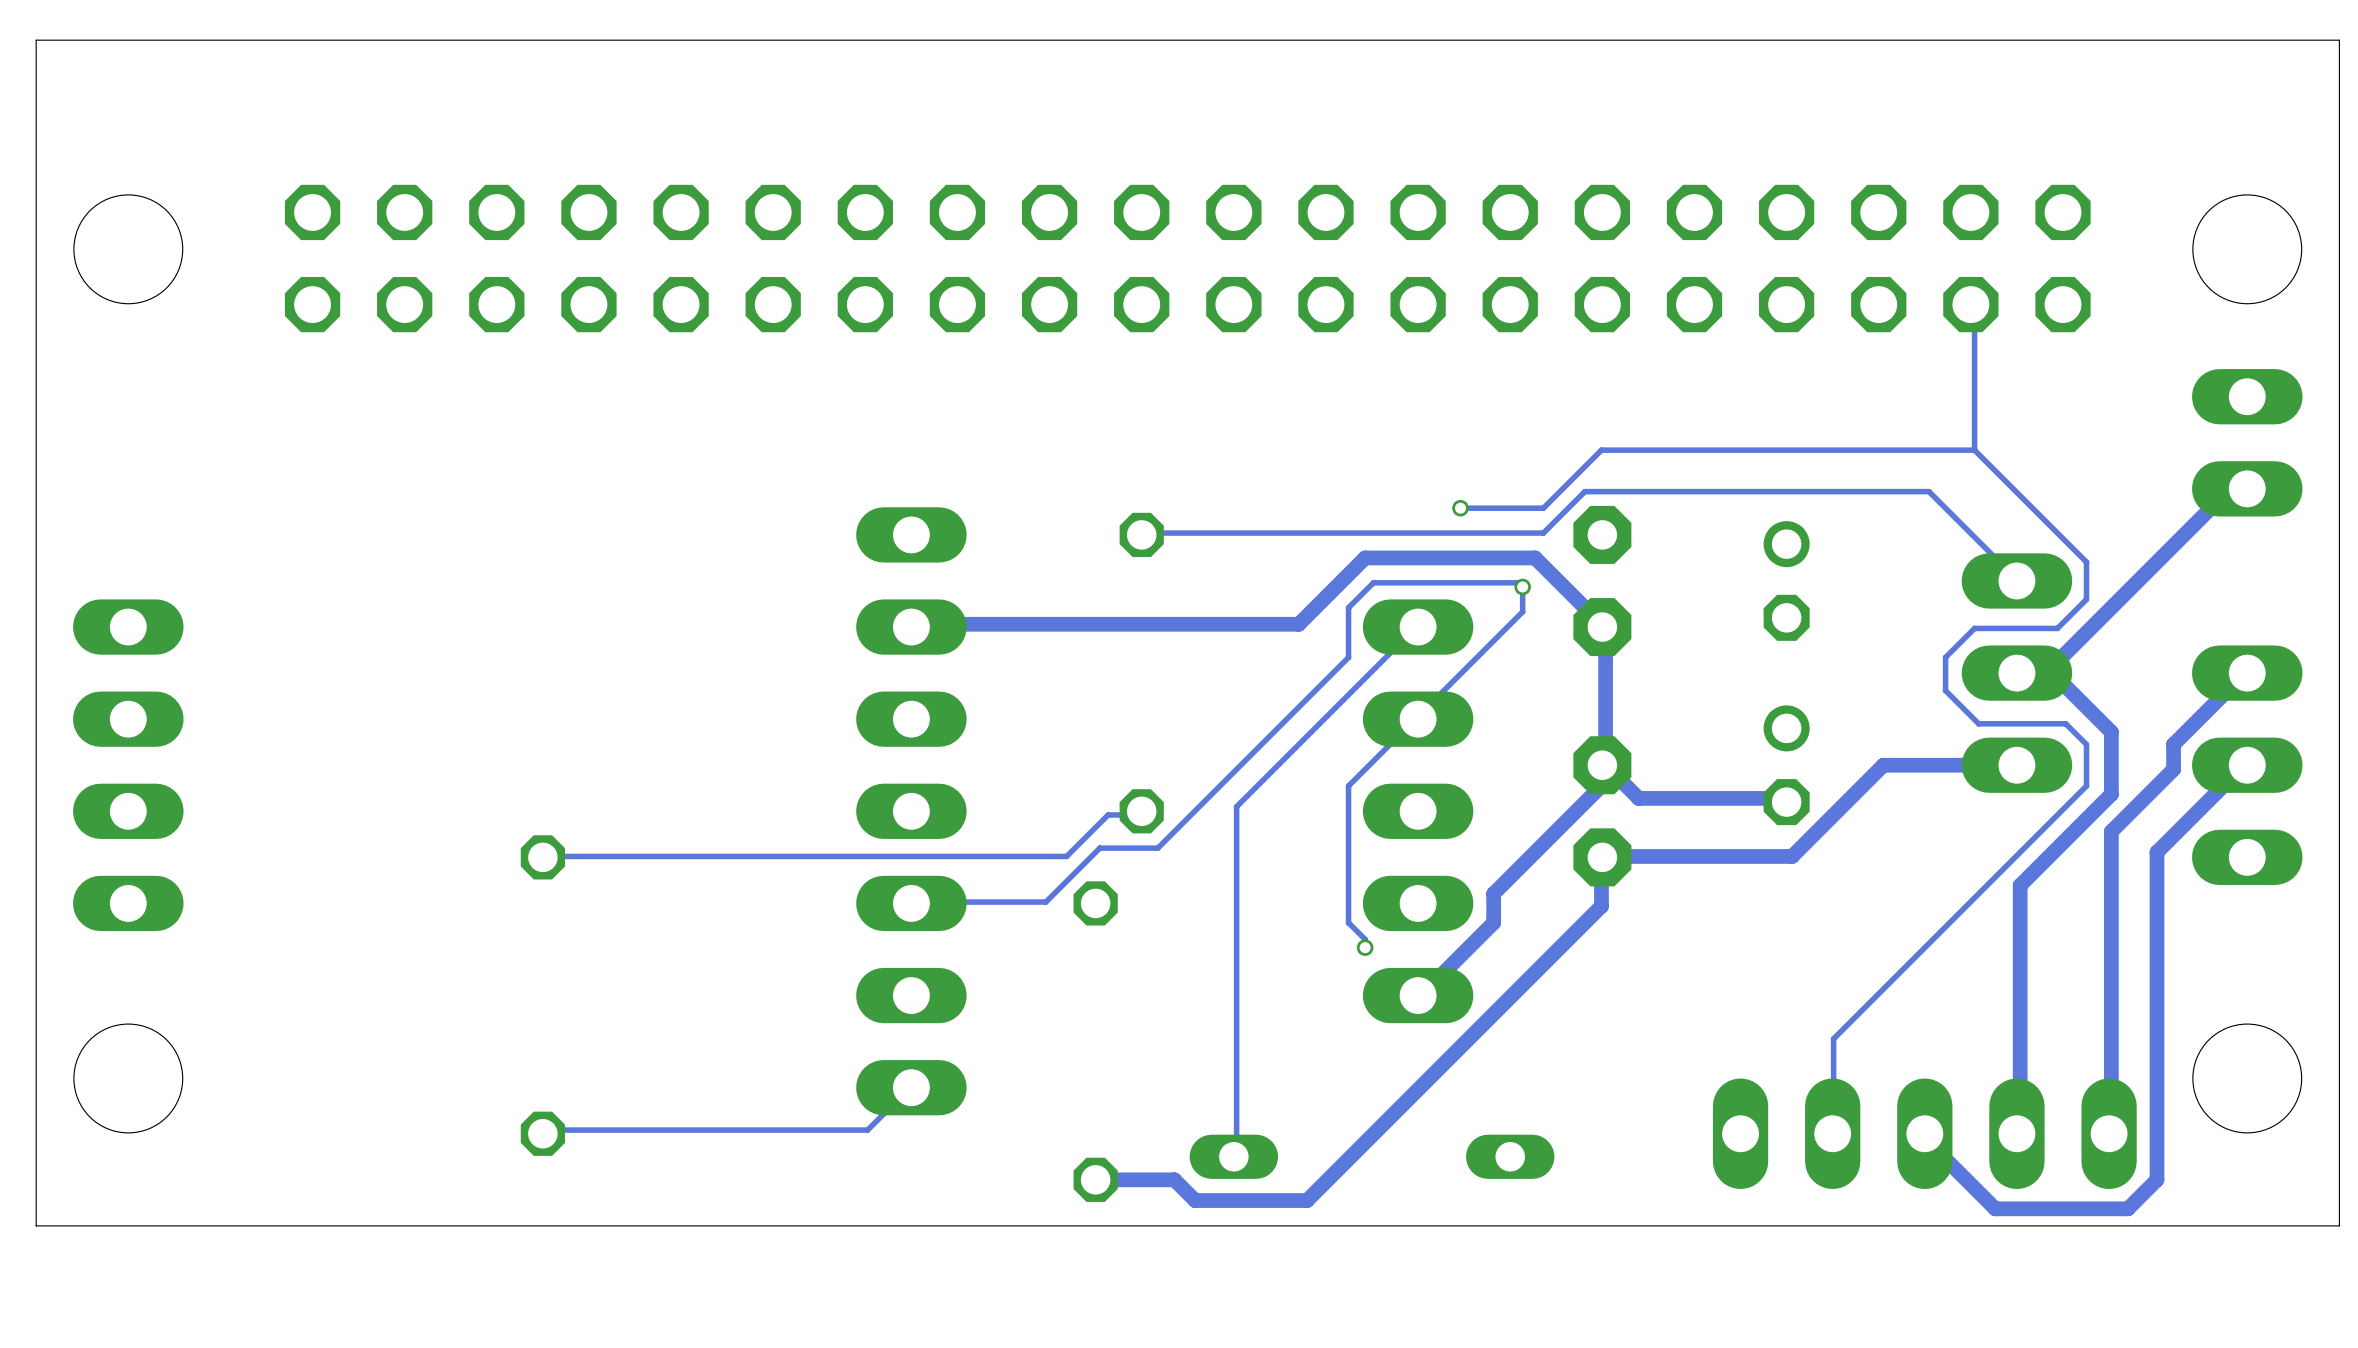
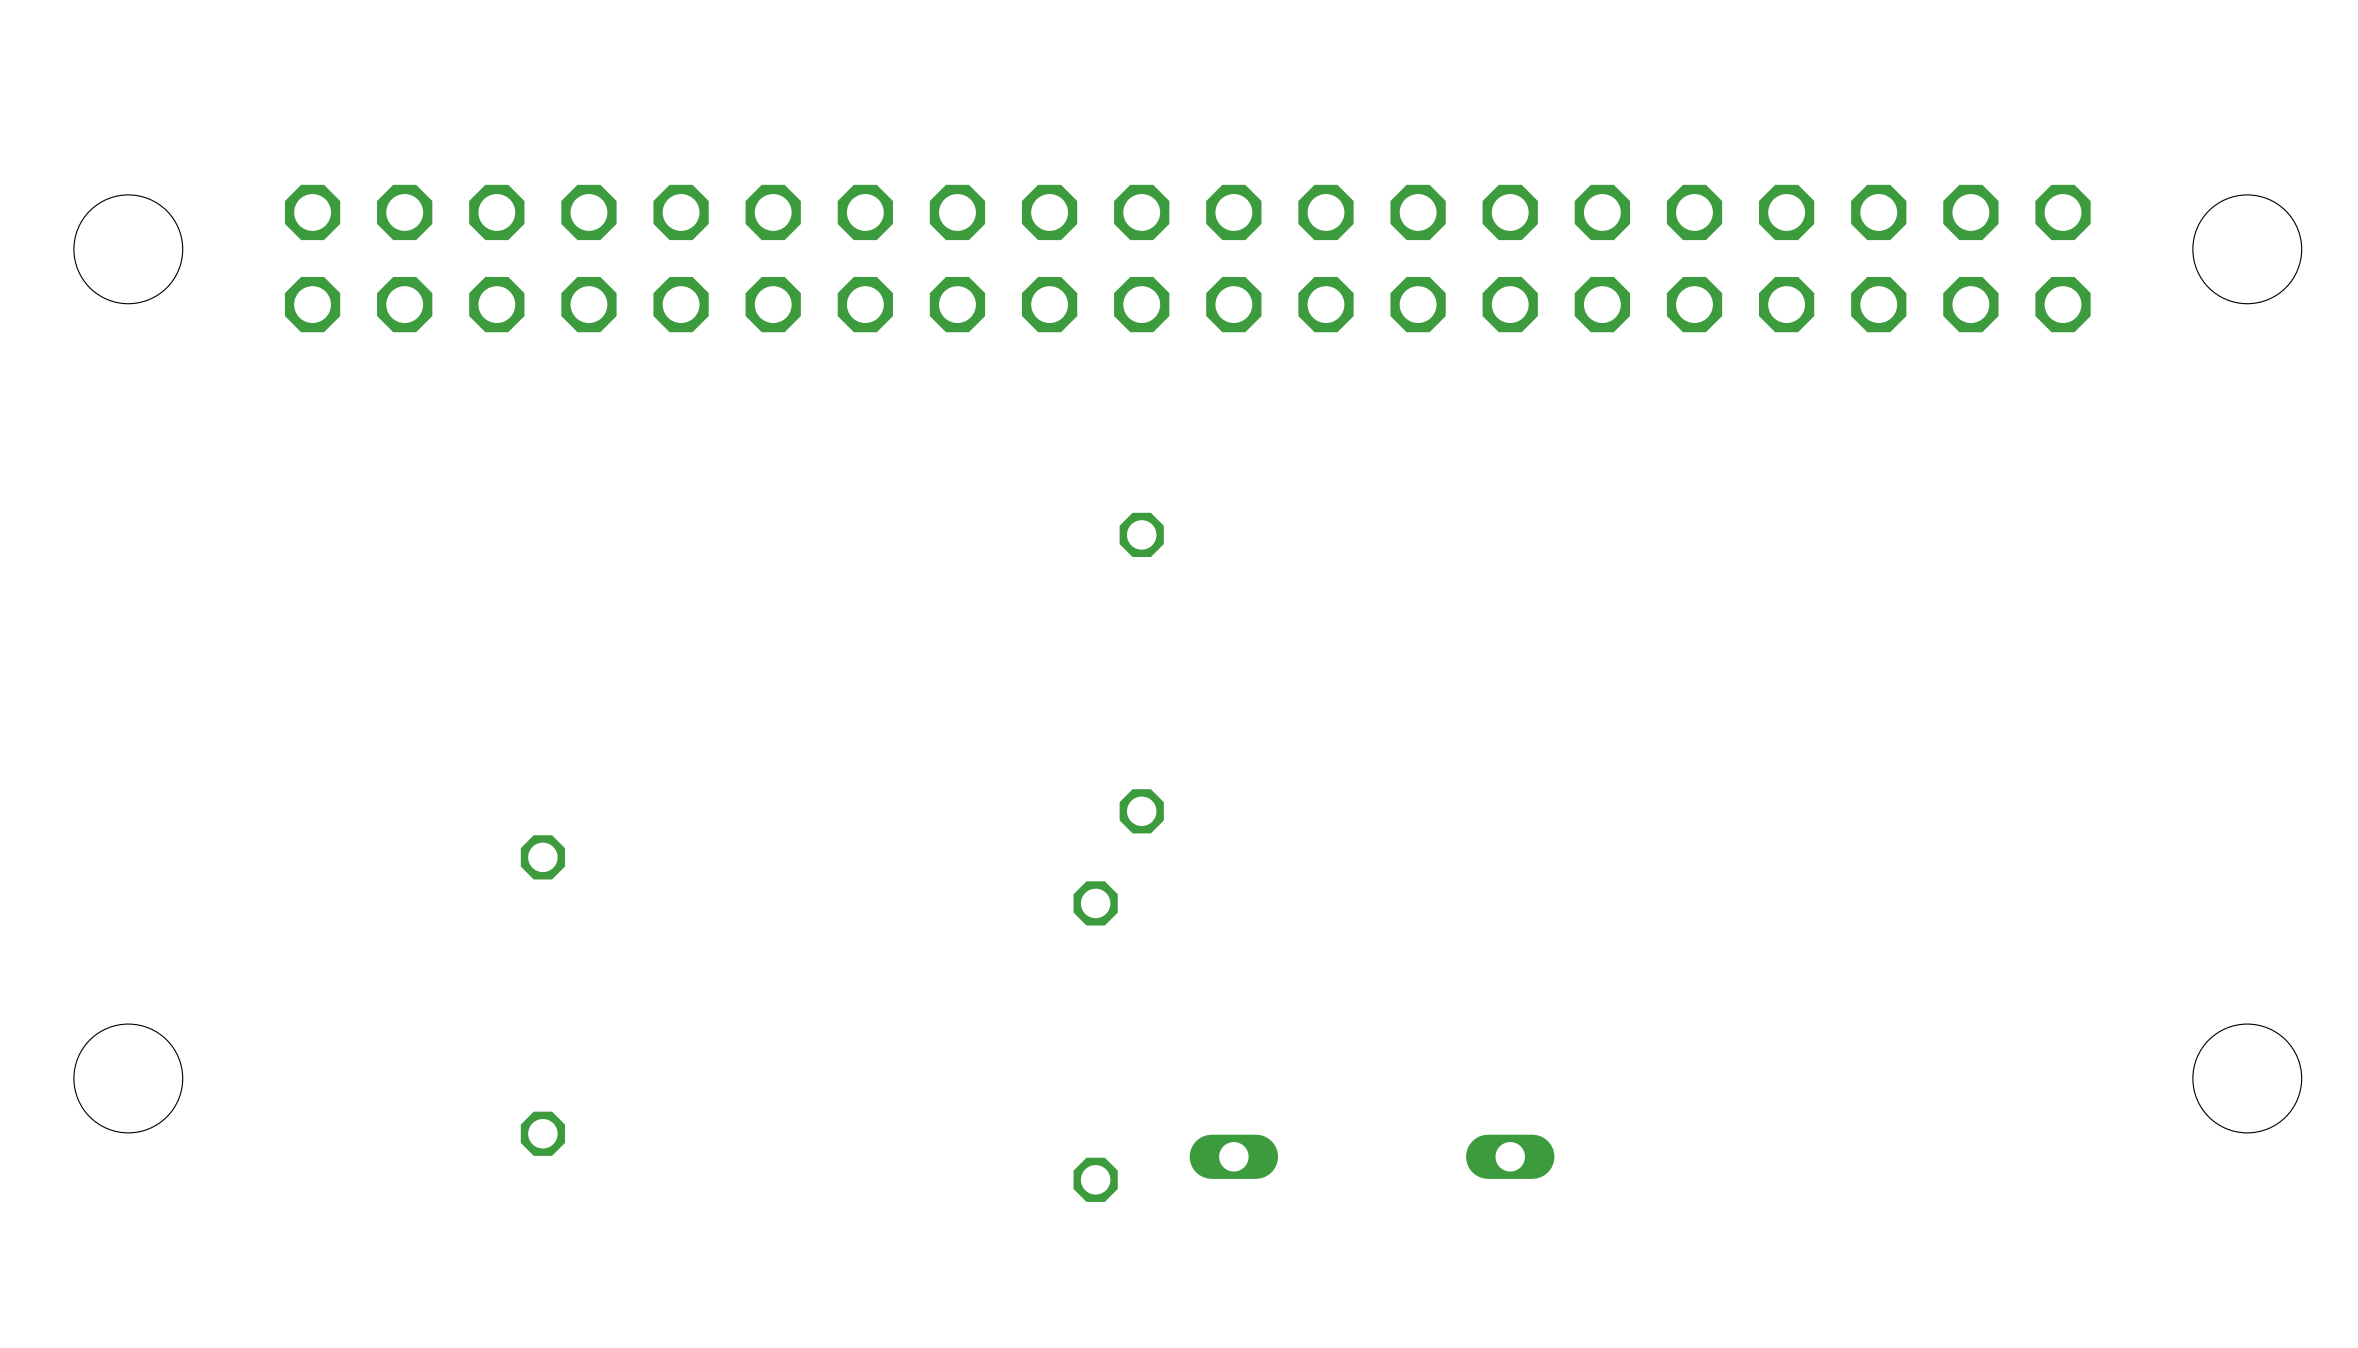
board edge: (2339, 40) (36, 40) (36, 1225) (2339, 1225) (2339, 40) -> none
track: (1970, 304) (1974, 305) (1974, 450) -> none
part: (2247, 442) -> none
track: (1974, 450) (2086, 562) (2086, 599) (2057, 628) (1974, 628) (1945, 657) (1945, 690) (1978, 723) (2065, 723) (2086, 744) (2086, 785) (1833, 1038) (1832, 1133) -> none
track: (1974, 450) (1601, 450) (1543, 508) (1460, 508) -> none
track: (2247, 488) (2244, 491) (2227, 491) (2049, 669) (2020, 669) (2016, 673) (2053, 674) (2111, 732) (2111, 794) (2020, 885) (2020, 1130) (2016, 1133) -> none
via: (1460, 508) -> none
track: (1141, 534) (1145, 533) (1543, 533) (1584, 491) (1928, 491) (2016, 580) -> none
part: (1602, 580) -> none
part: (1786, 580) -> none
via: (1522, 586) -> none
track: (911, 627) (913, 624) (1298, 624) (1365, 557) (1535, 557) (1601, 624) (1605, 632) (1605, 761) (1602, 765) -> none
track: (1418, 627) (1236, 806) (1236, 1154) (1233, 1156) -> none
part: (2016, 673) -> none
track: (2247, 673) (2244, 674) (2173, 744) (2173, 769) (2111, 831) (2111, 1130) (2109, 1133) -> none
part: (128, 765) -> none
track: (1602, 765) (1605, 765) (1638, 798) (1783, 798) (1786, 802) -> none
track: (1602, 765) (1609, 777) (1493, 893) (1493, 922) (1419, 997) (1418, 995) -> none
part: (1786, 765) -> none
track: (2016, 765) (1883, 765) (1792, 856) (1602, 857) (1601, 906) (1307, 1200) (1195, 1200) (1174, 1179) (1095, 1179) -> none
track: (2247, 765) (2244, 765) (2156, 852) (2156, 1179) (2127, 1208) (1995, 1208) (1924, 1138) (1924, 1133) -> none
part: (2247, 765) -> none
part: (911, 811) -> none
track: (1141, 811) (1141, 814) (1108, 814) (1066, 856) (542, 857) -> none
part: (1418, 811) -> none
part: (1602, 811) -> none
track: (911, 903) (1045, 902) (1099, 848) (1157, 848) (1348, 657) (1348, 607) (1373, 582) (1518, 582) (1522, 586) (1522, 611) (1419, 715) (1418, 719) (1414, 719) (1348, 785) (1348, 922) (1365, 939) (1365, 947) -> none
via: (1365, 947) -> none
track: (911, 1087) (867, 1130) (544, 1130) (542, 1133) -> none
part: (1924, 1133) -> none

